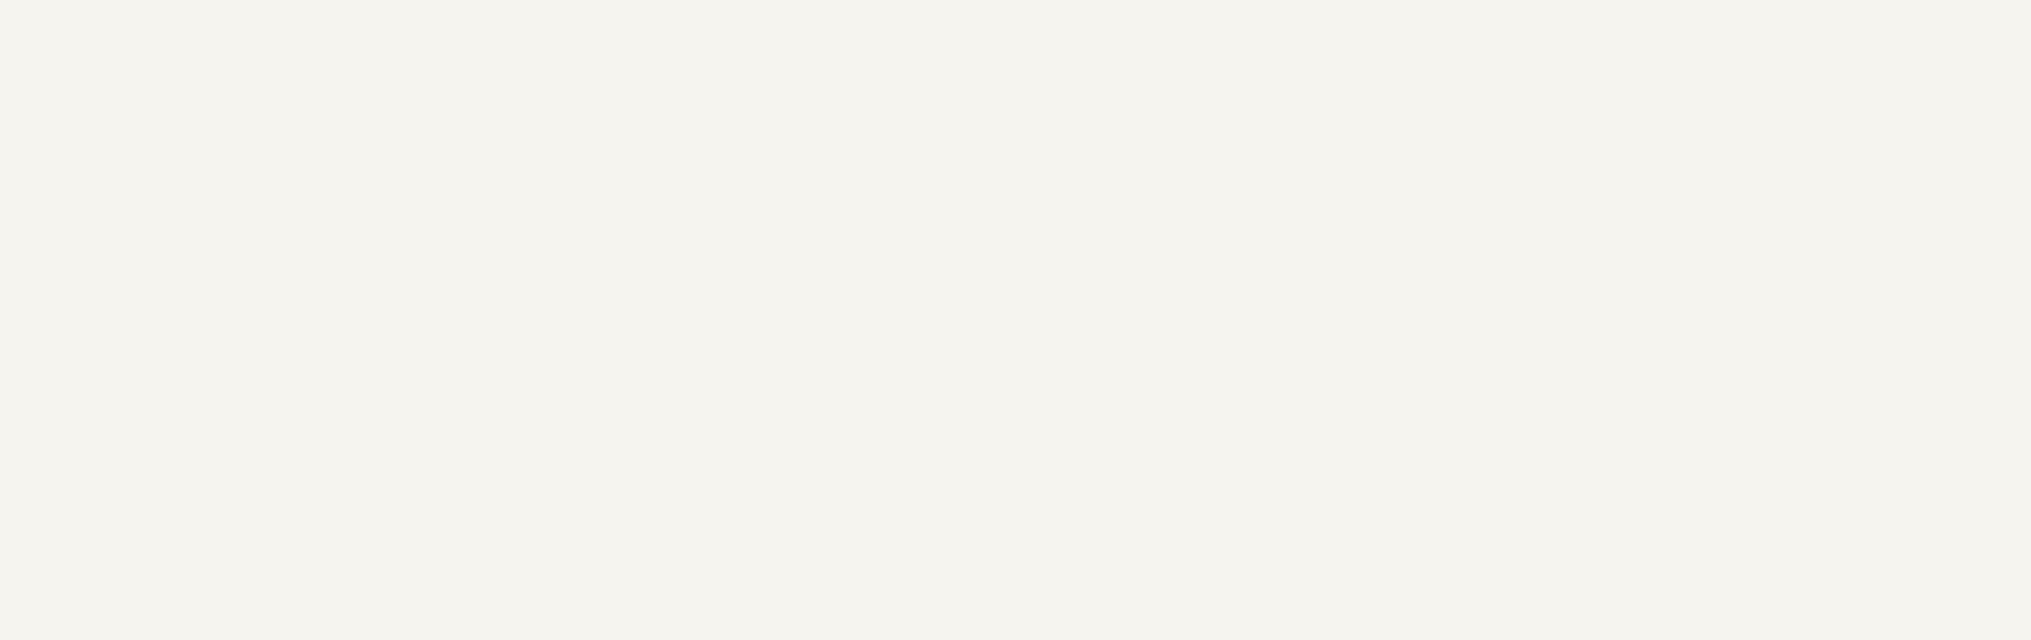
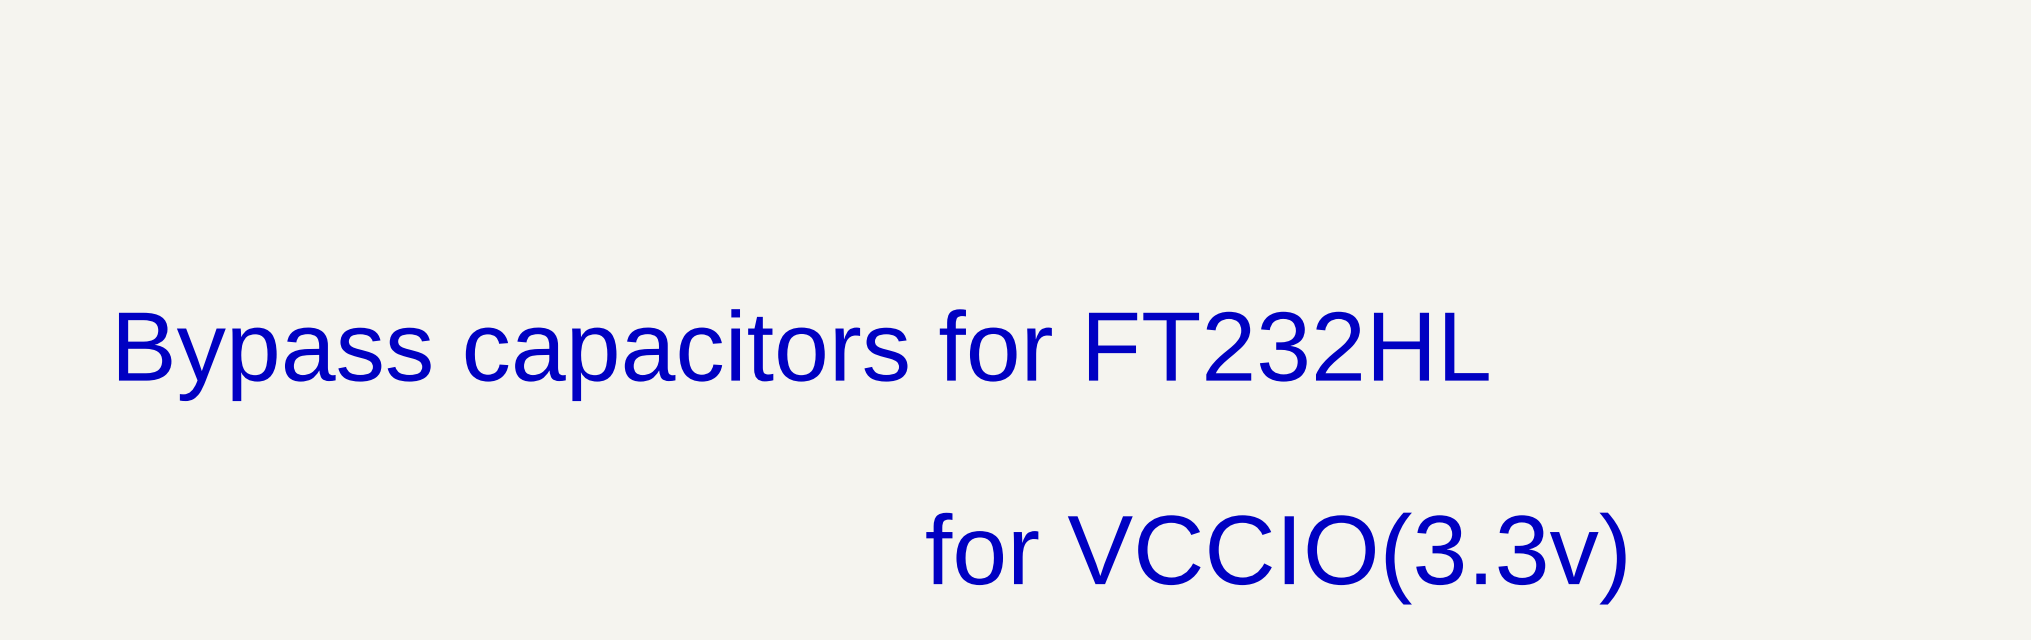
text: none -> Bypass capacitors for FT232HL (803, 355)
text: none -> for VCCIO(3.3v) (1275, 558)

